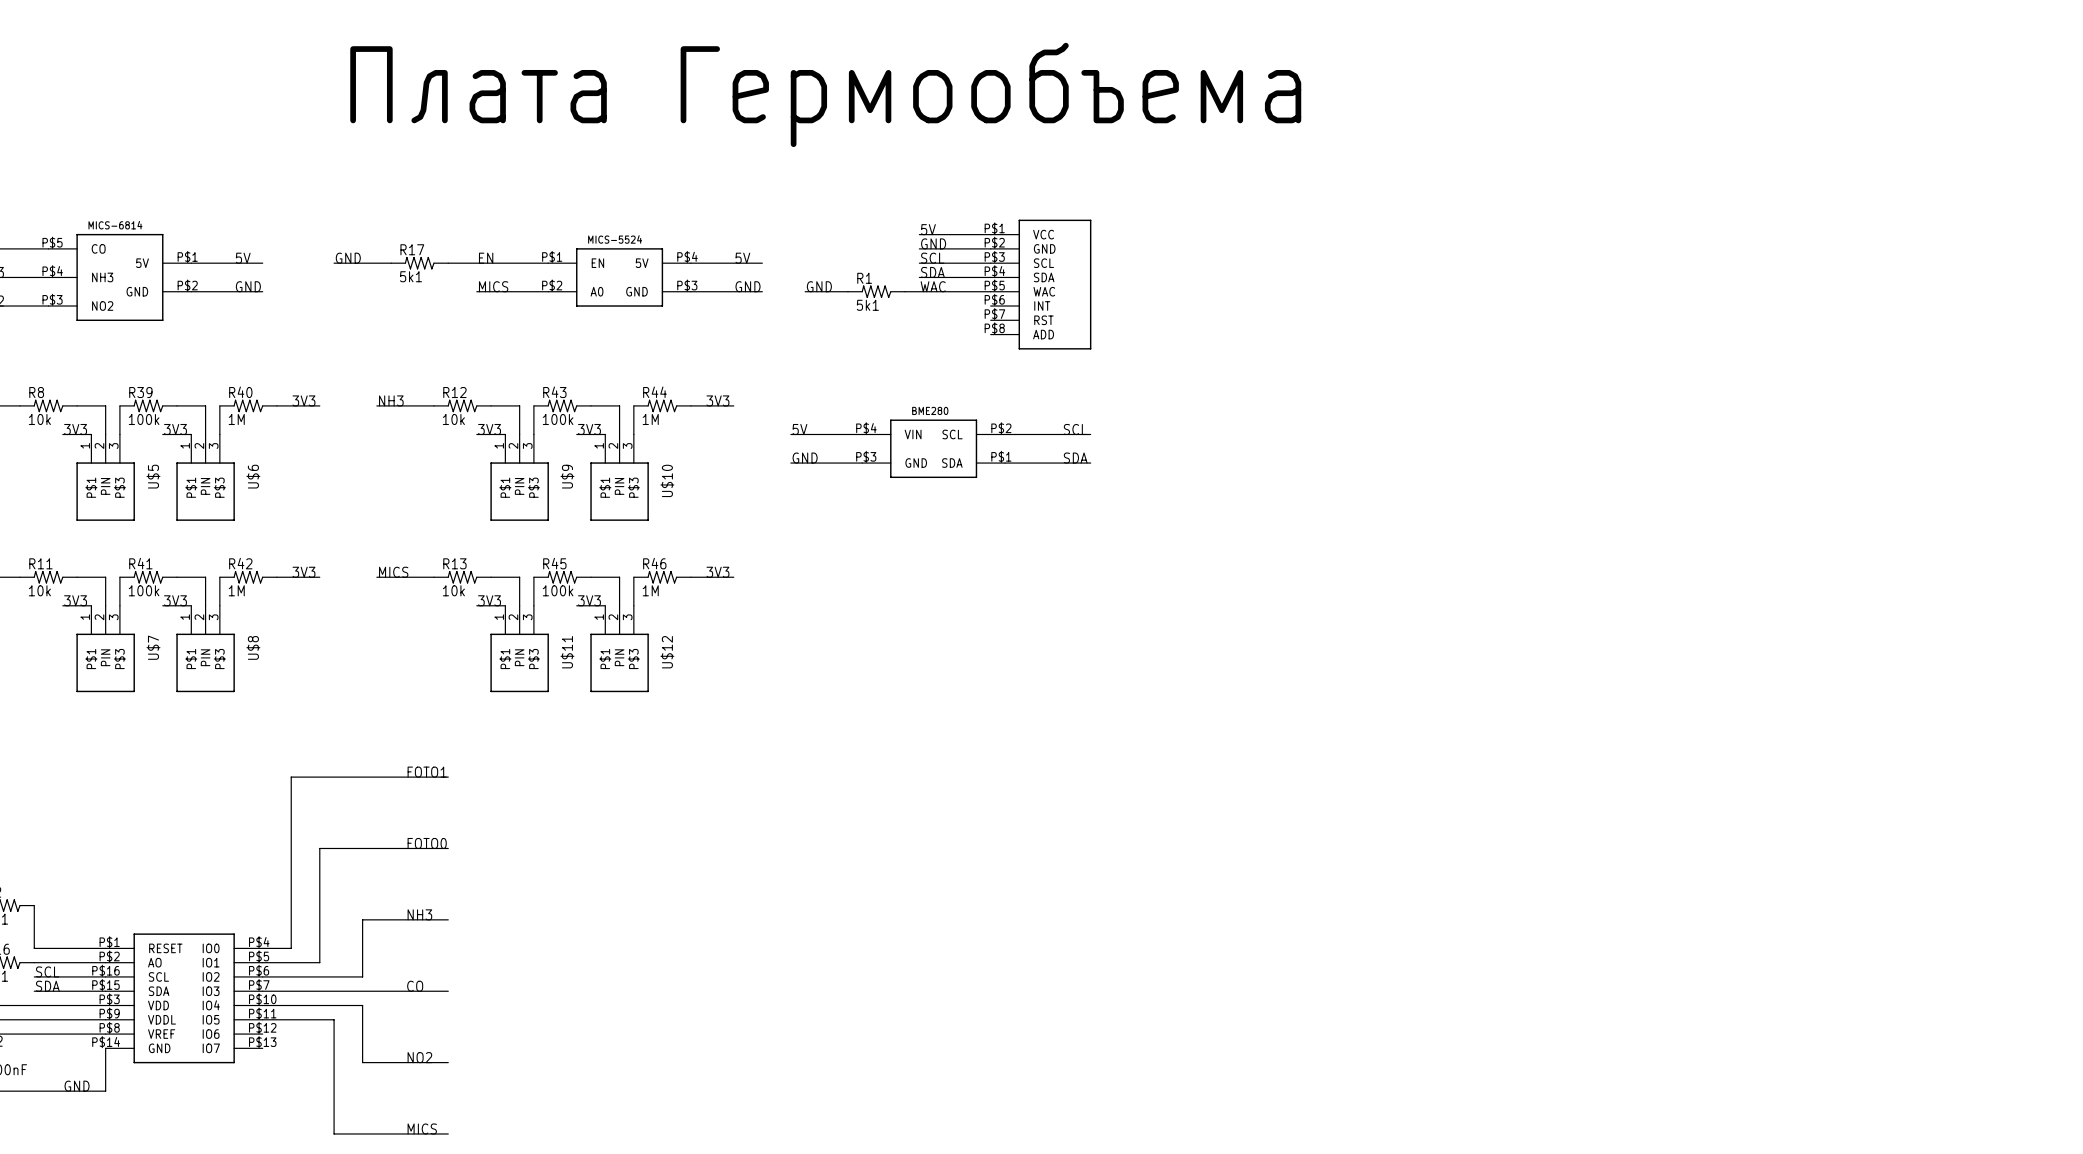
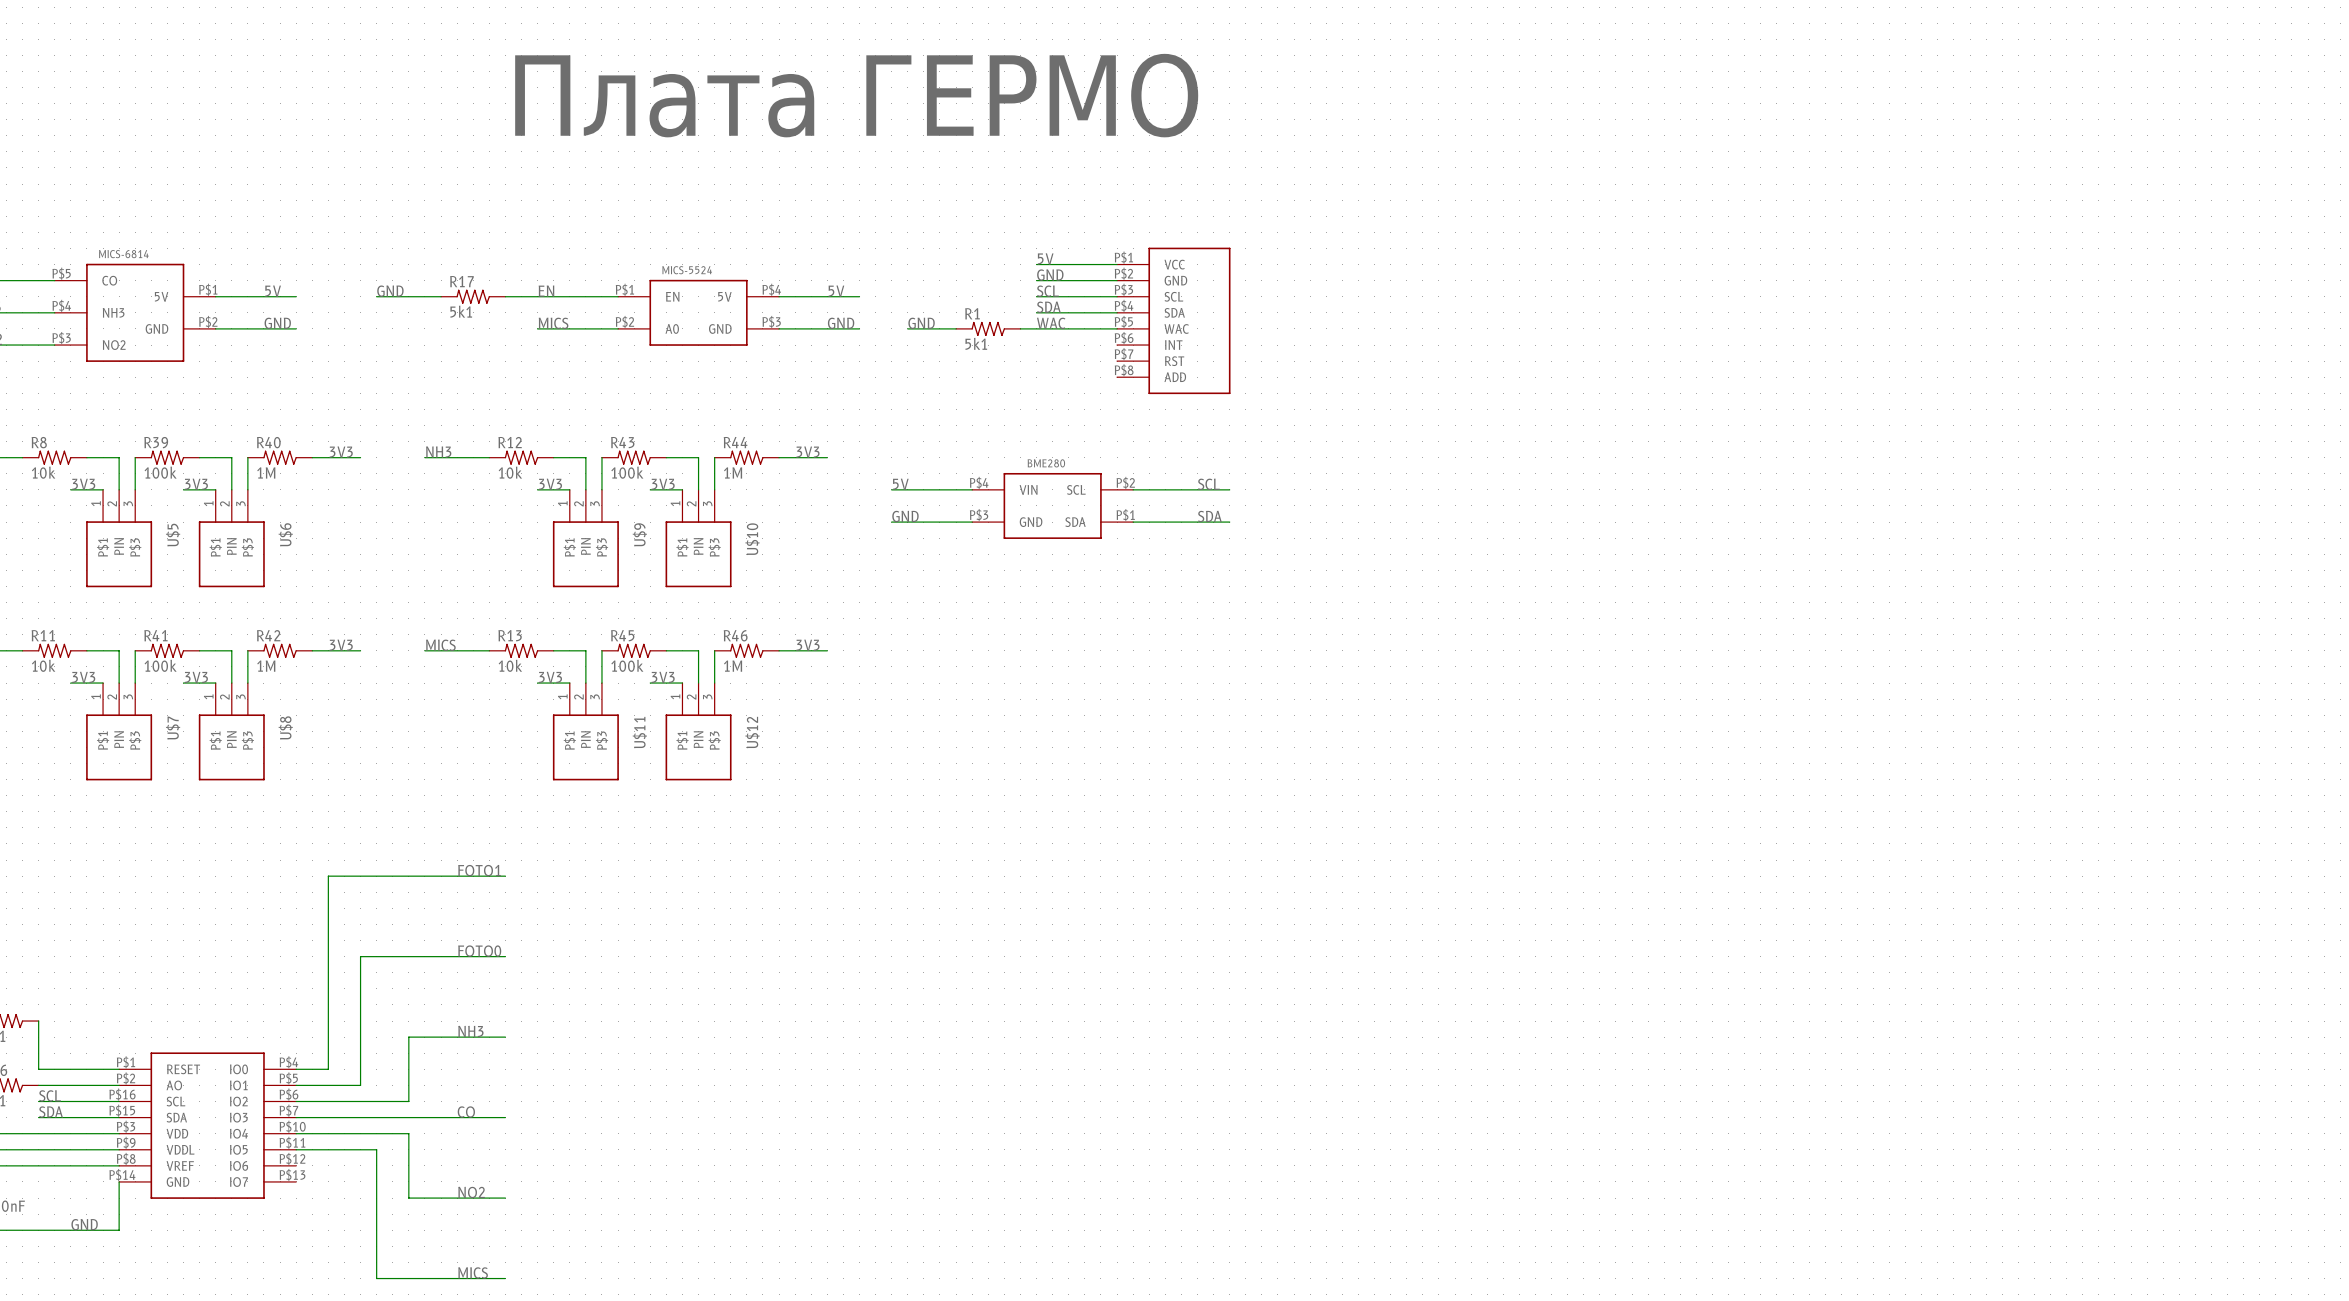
part: none -> Плата ГЕРМО (856, 95)
part: Плата Гермообъема (825, 94) -> none

